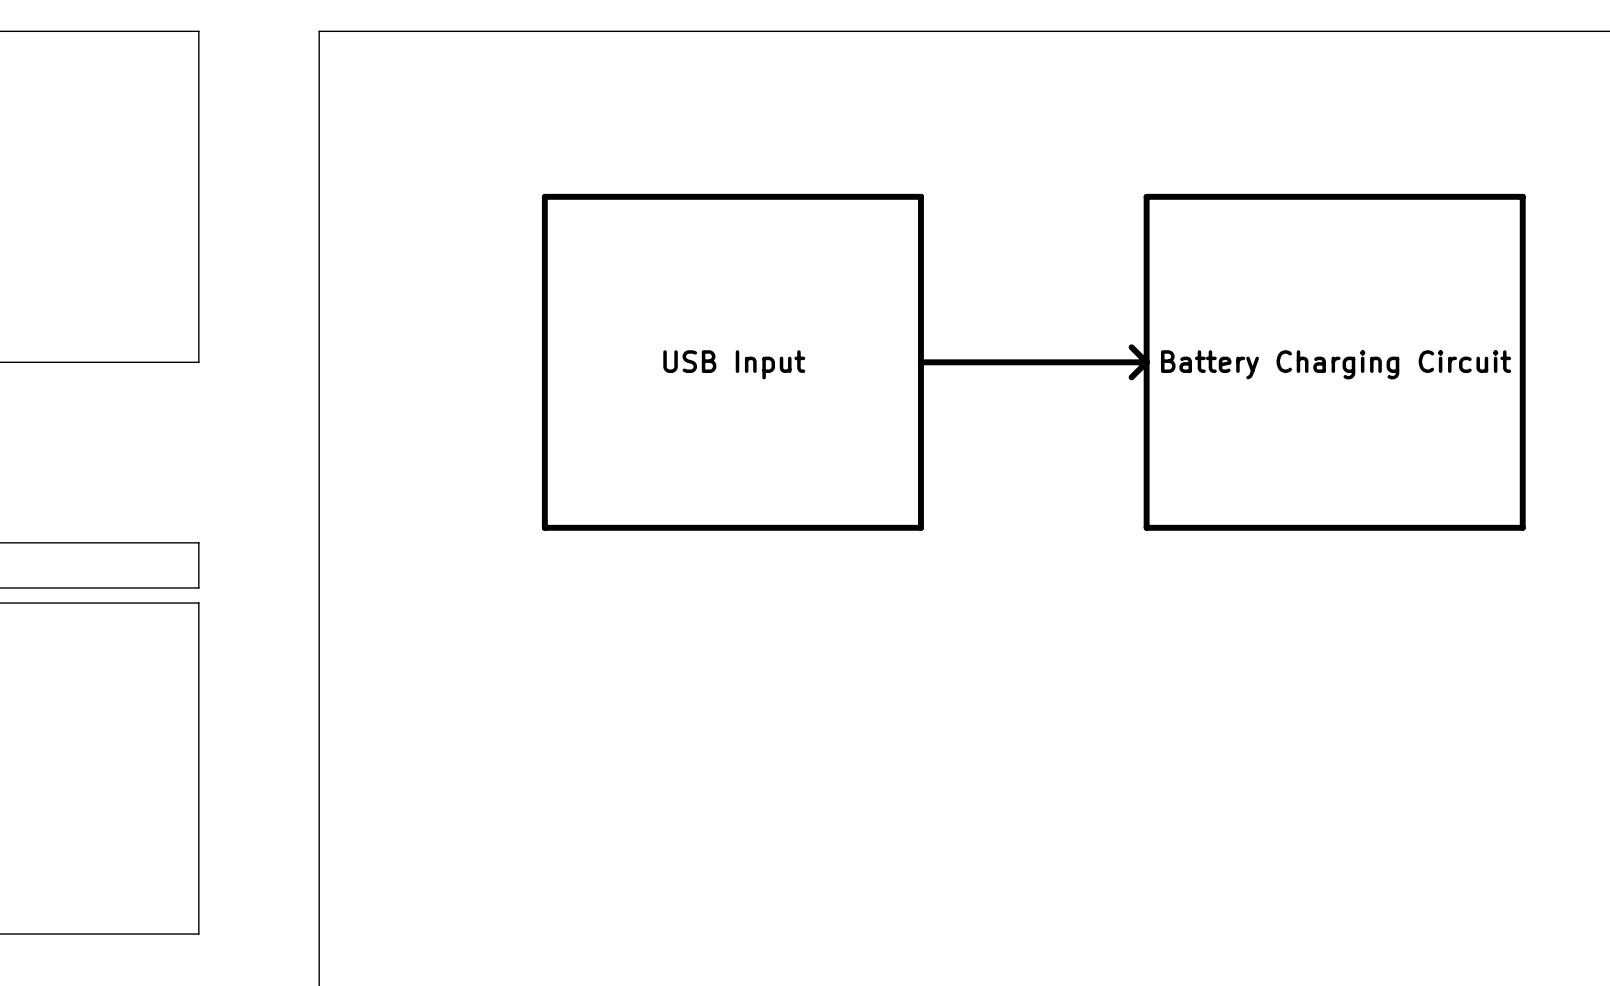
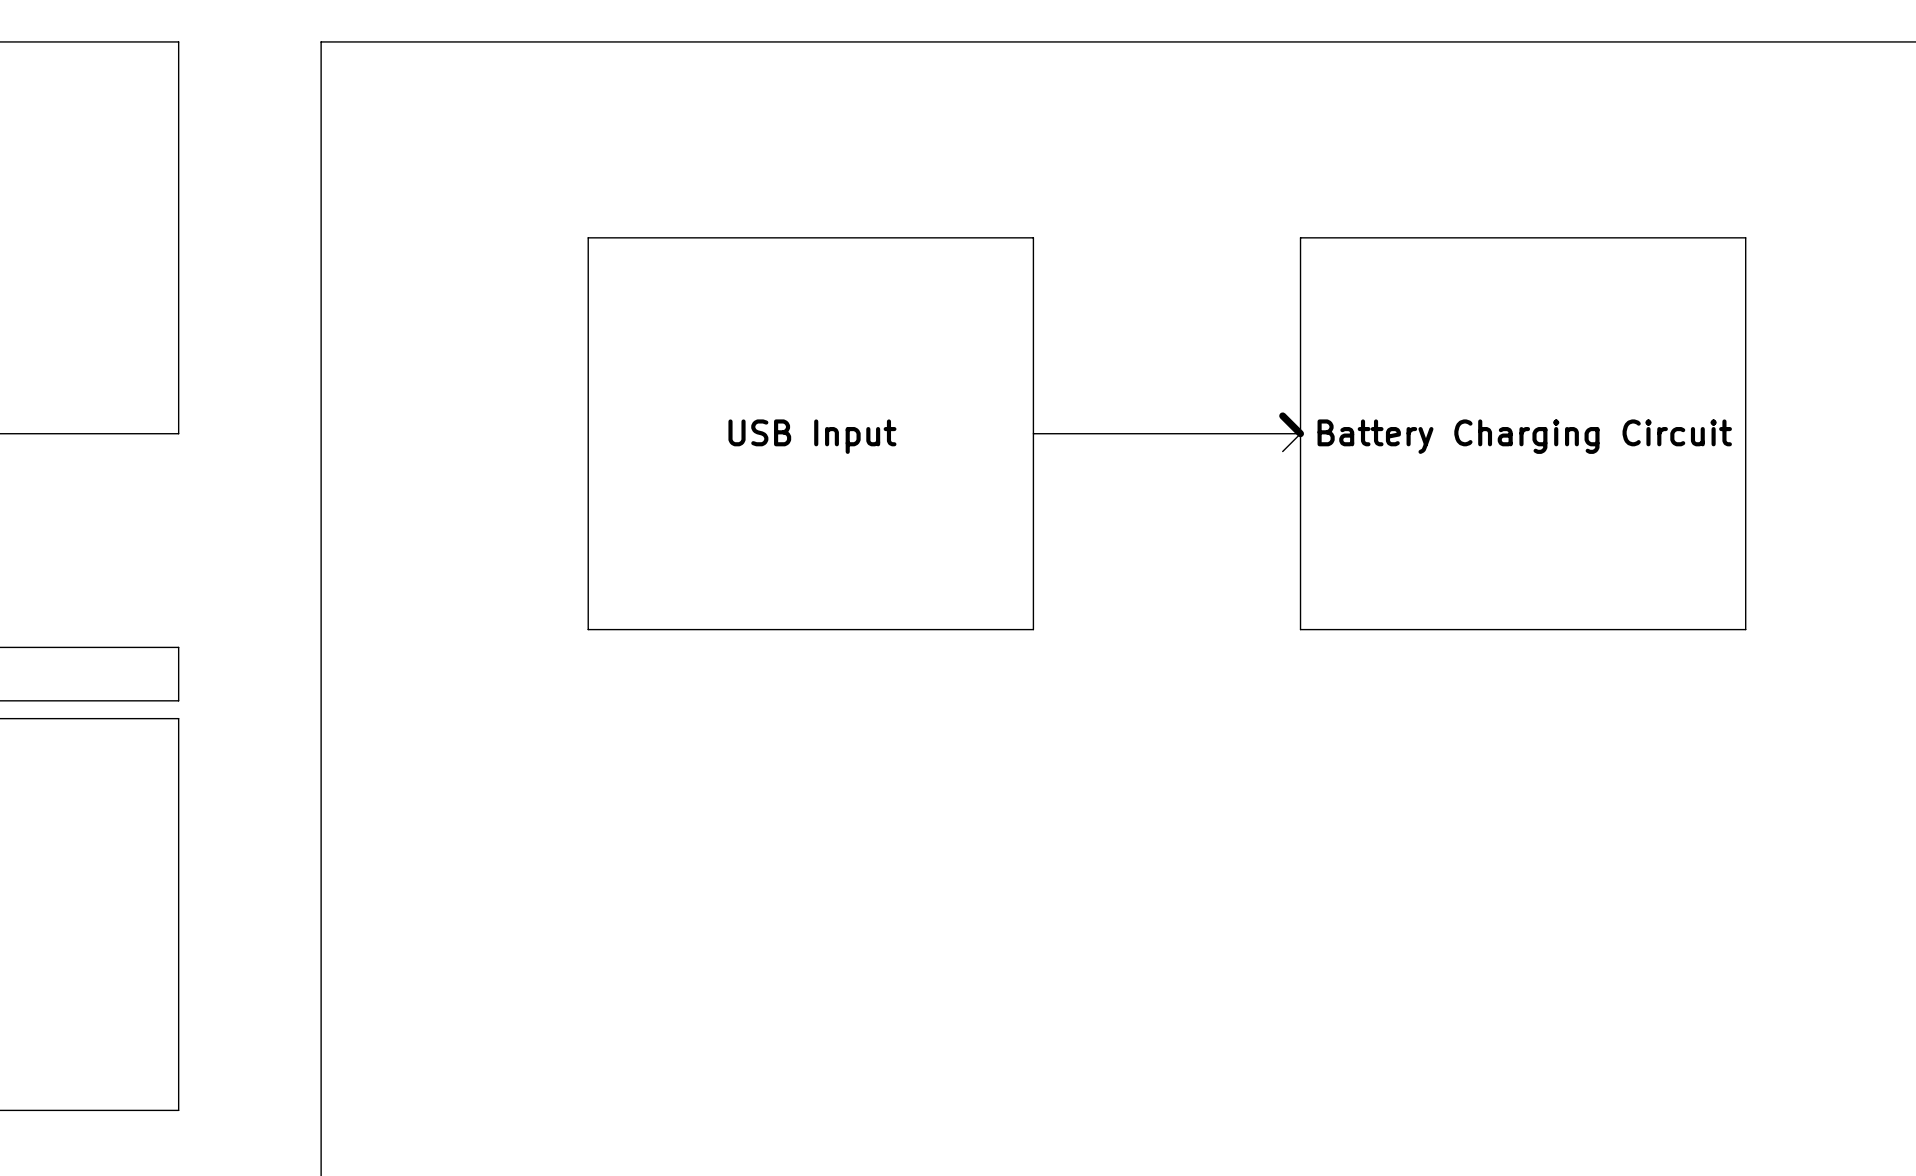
line width: thick (544, 196) (920, 196) (920, 527) (544, 527) (544, 196) -> thin (588, 237) (1033, 237) (1033, 629) (588, 629) (588, 237)
line width: thick (1146, 196) (1522, 196) (1522, 527) (1146, 527) (1146, 196) -> thin (1300, 237) (1745, 237) (1745, 629) (1300, 629) (1300, 237)
line width: thick (920, 362) (1146, 362) (1131, 377) -> thin (1033, 433) (1300, 433) (1282, 451)

